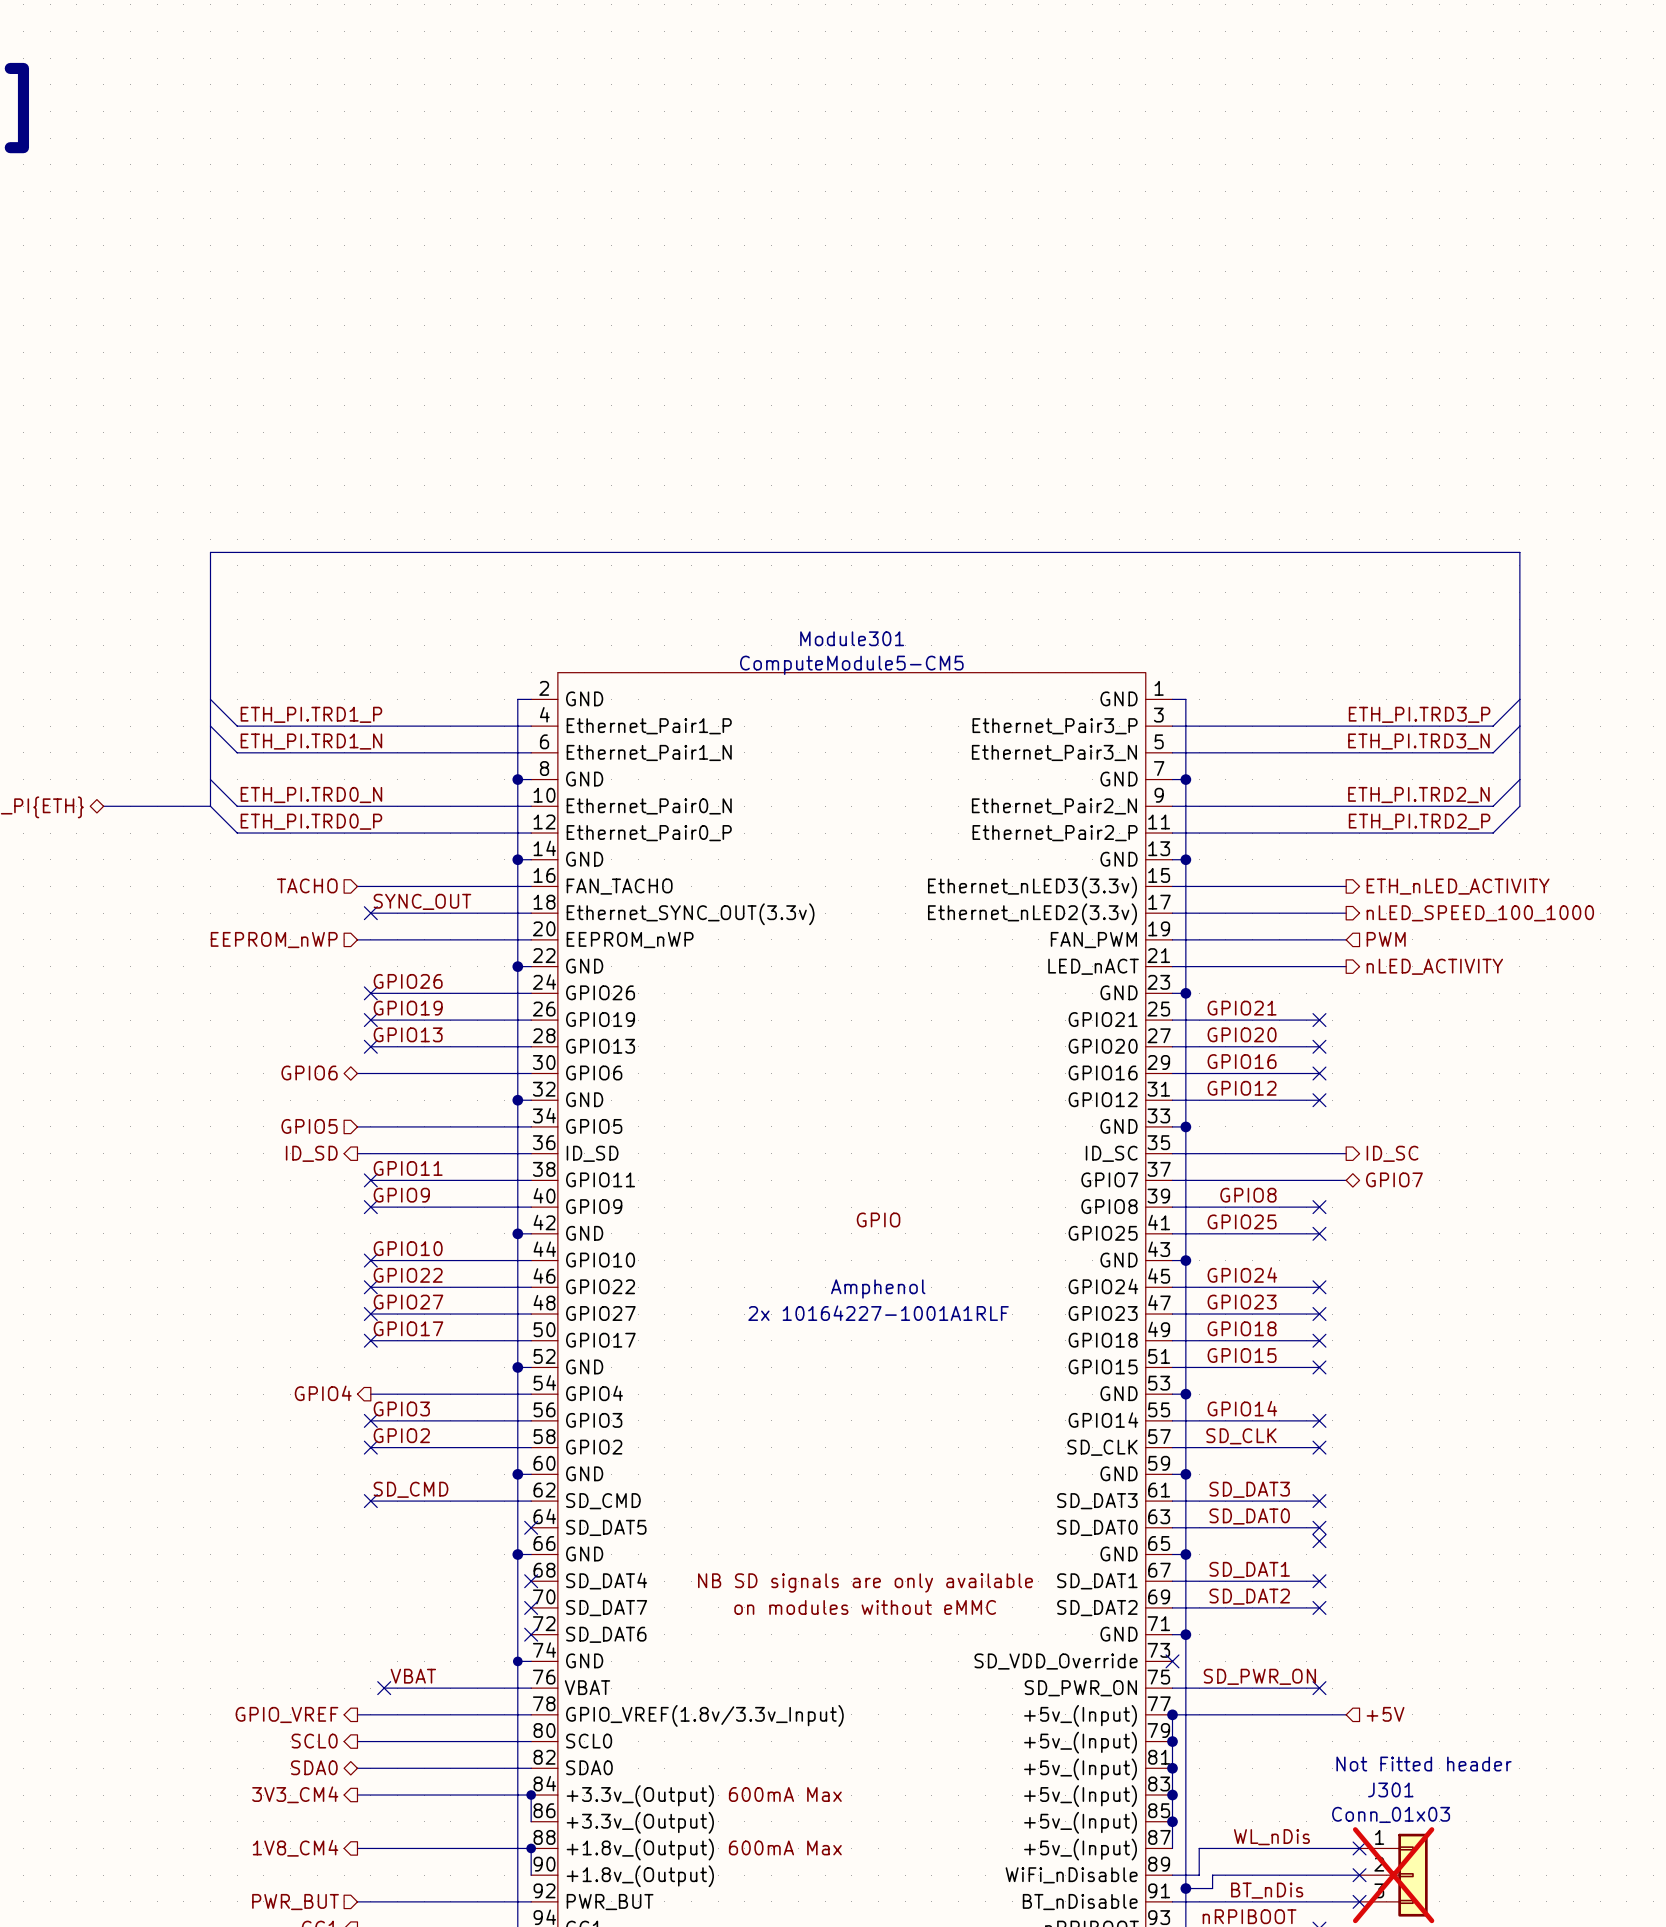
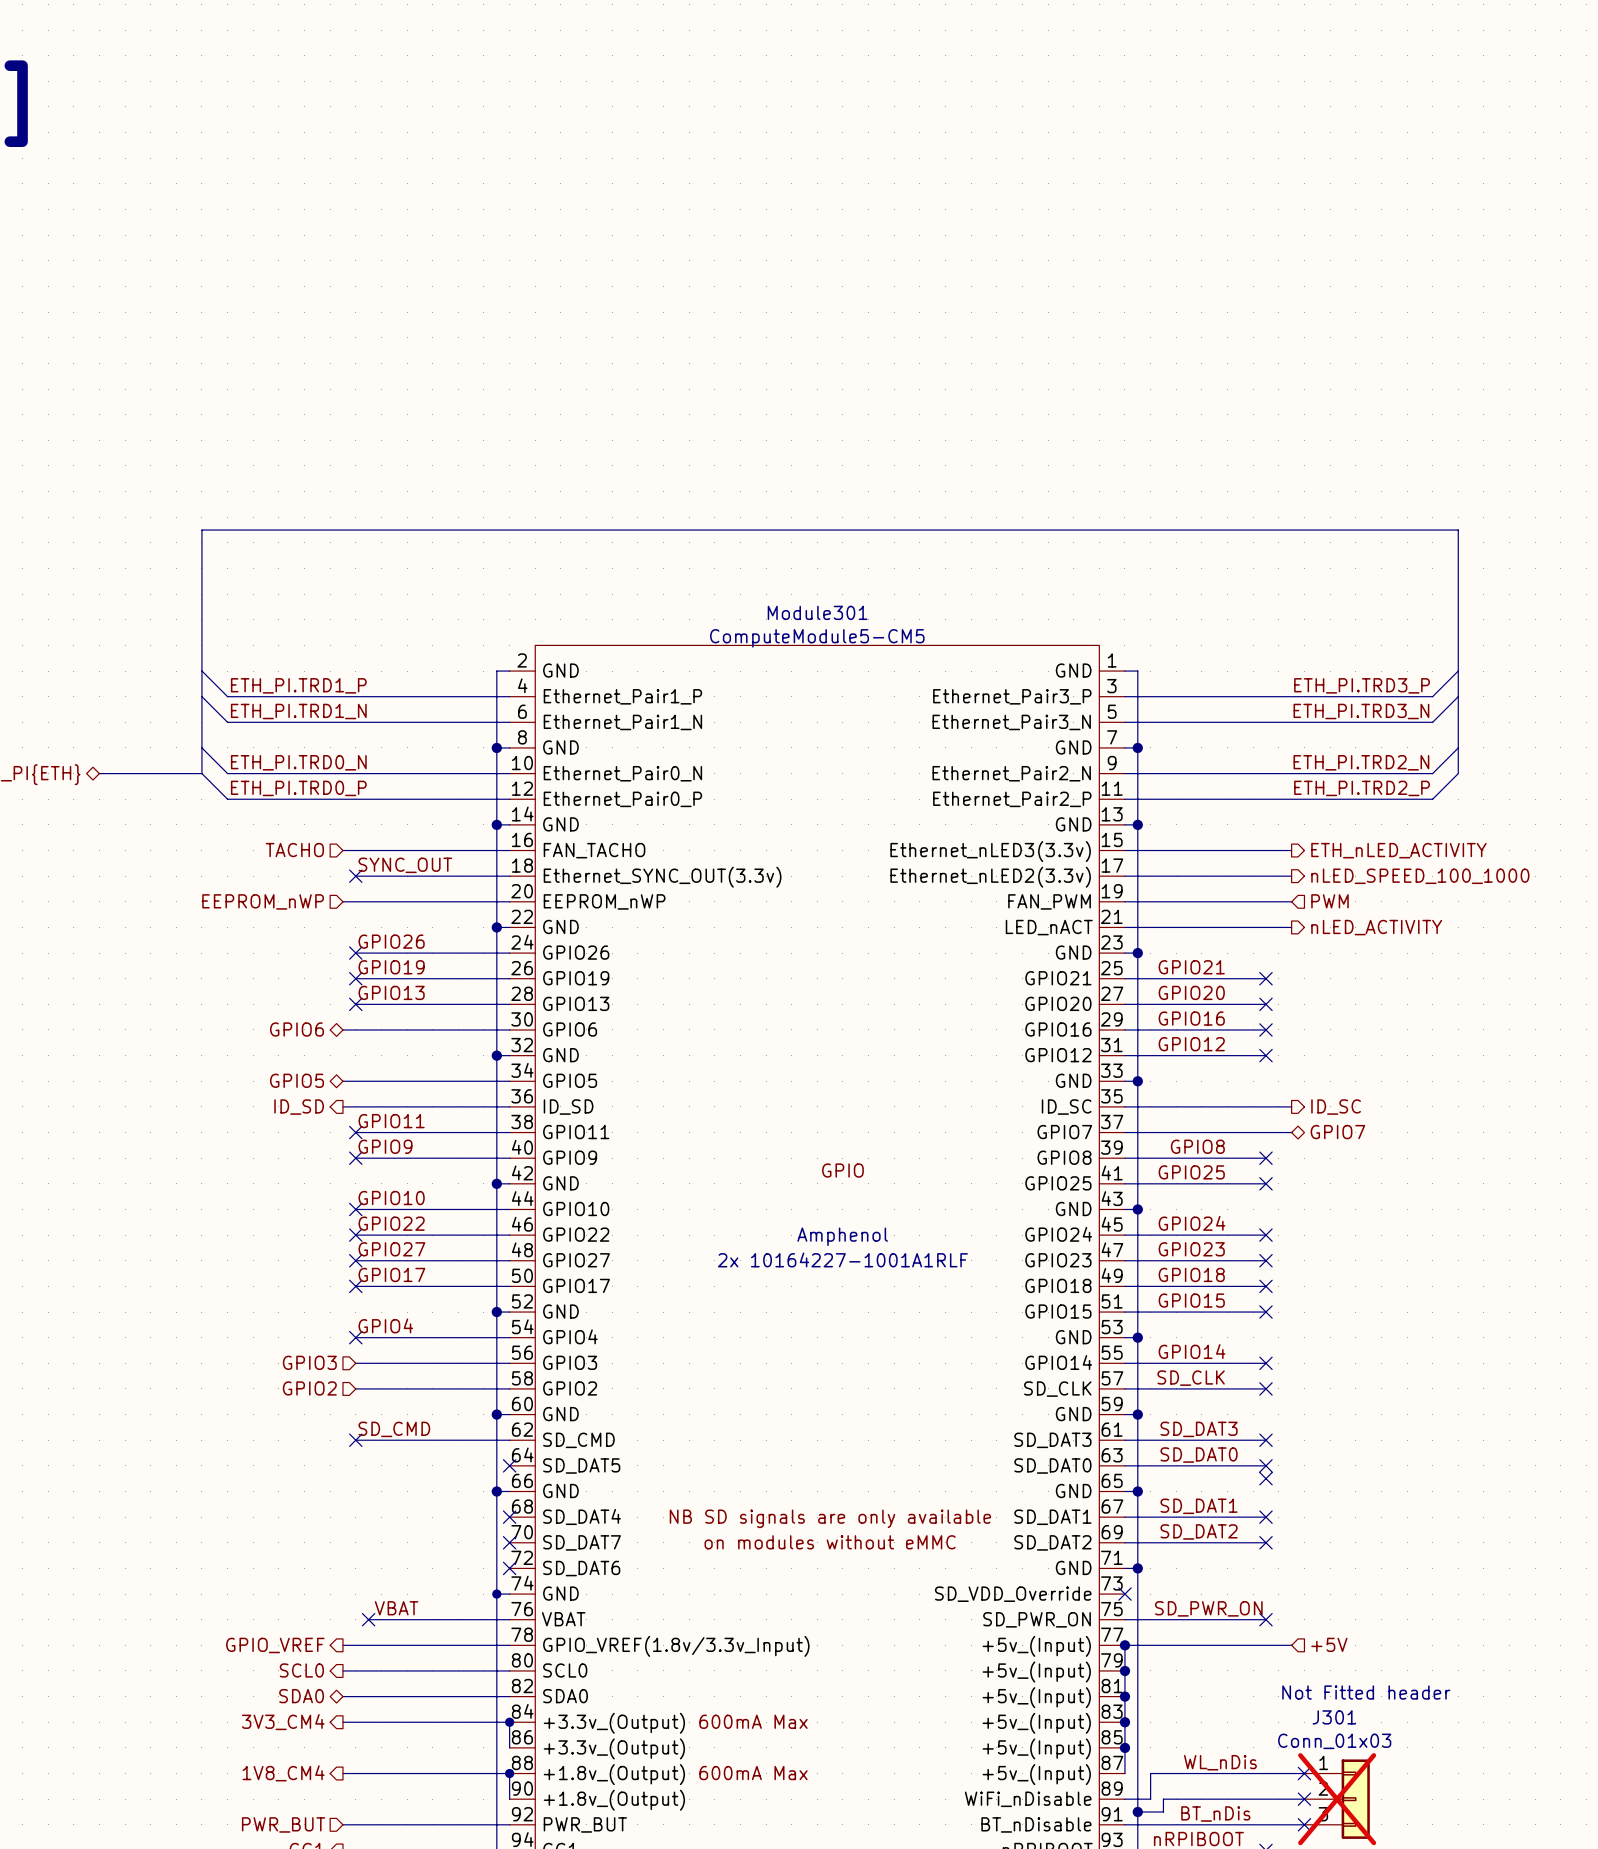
hierarchical label shape: input (309, 1126) -> bidirectional (296, 1080)
hierarchical label shape: output (323, 1393) -> input (309, 1362)
hierarchical label: GPIO4 (323, 1393) -> GPIO3 (309, 1362)
no-connect mark: none -> (355, 1337)
label: GPIO3 (401, 1408) -> GPIO4 (385, 1325)
no-connect mark: (370, 1420) -> none
label: GPIO2 (401, 1435) -> none
hierarchical label: none -> GPIO2 (309, 1388)
no-connect mark: (370, 1447) -> none

